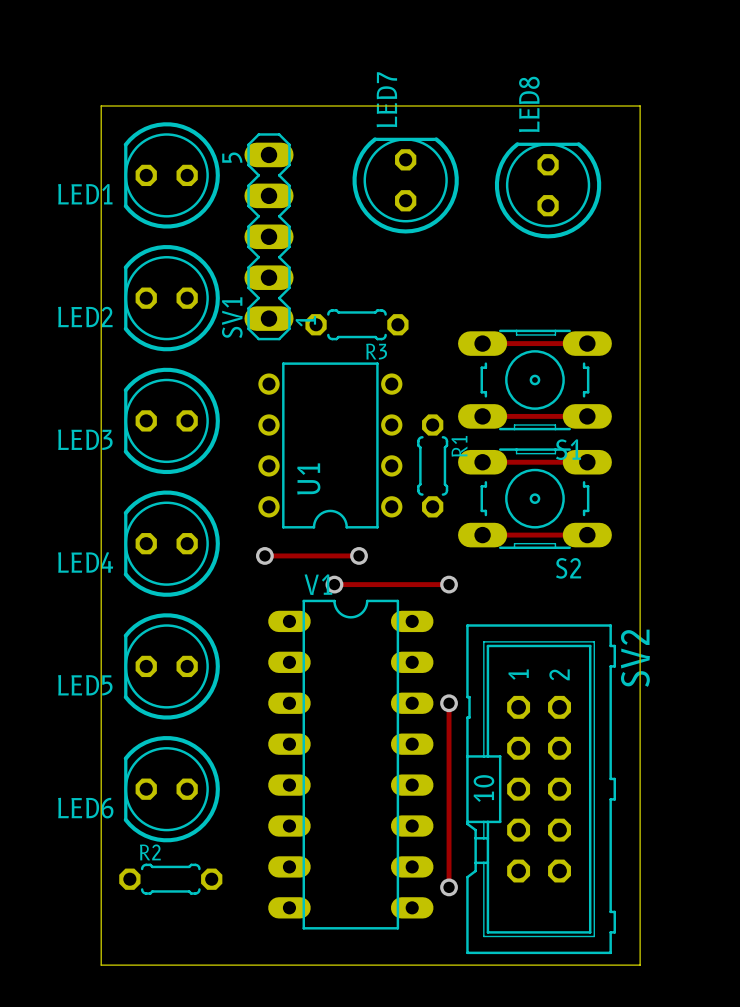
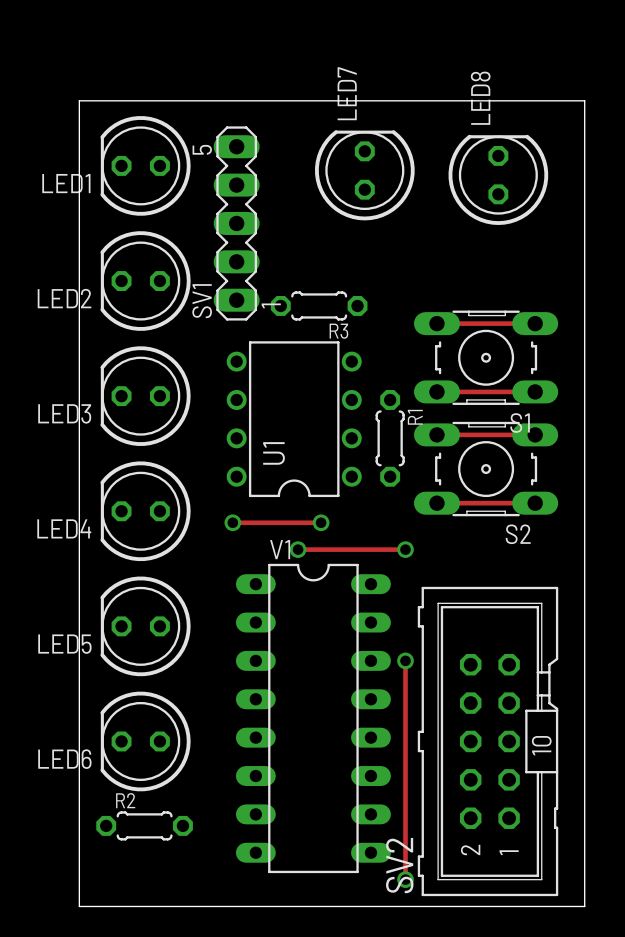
SV2 footprint: [466, 624, 616, 955] -> [417, 586, 559, 897]
SV2 name position: SV2 (635, 658) -> SV2 (399, 865)
track: none -> (405, 833) (405, 879)
via position: (449, 887) -> (405, 879)

